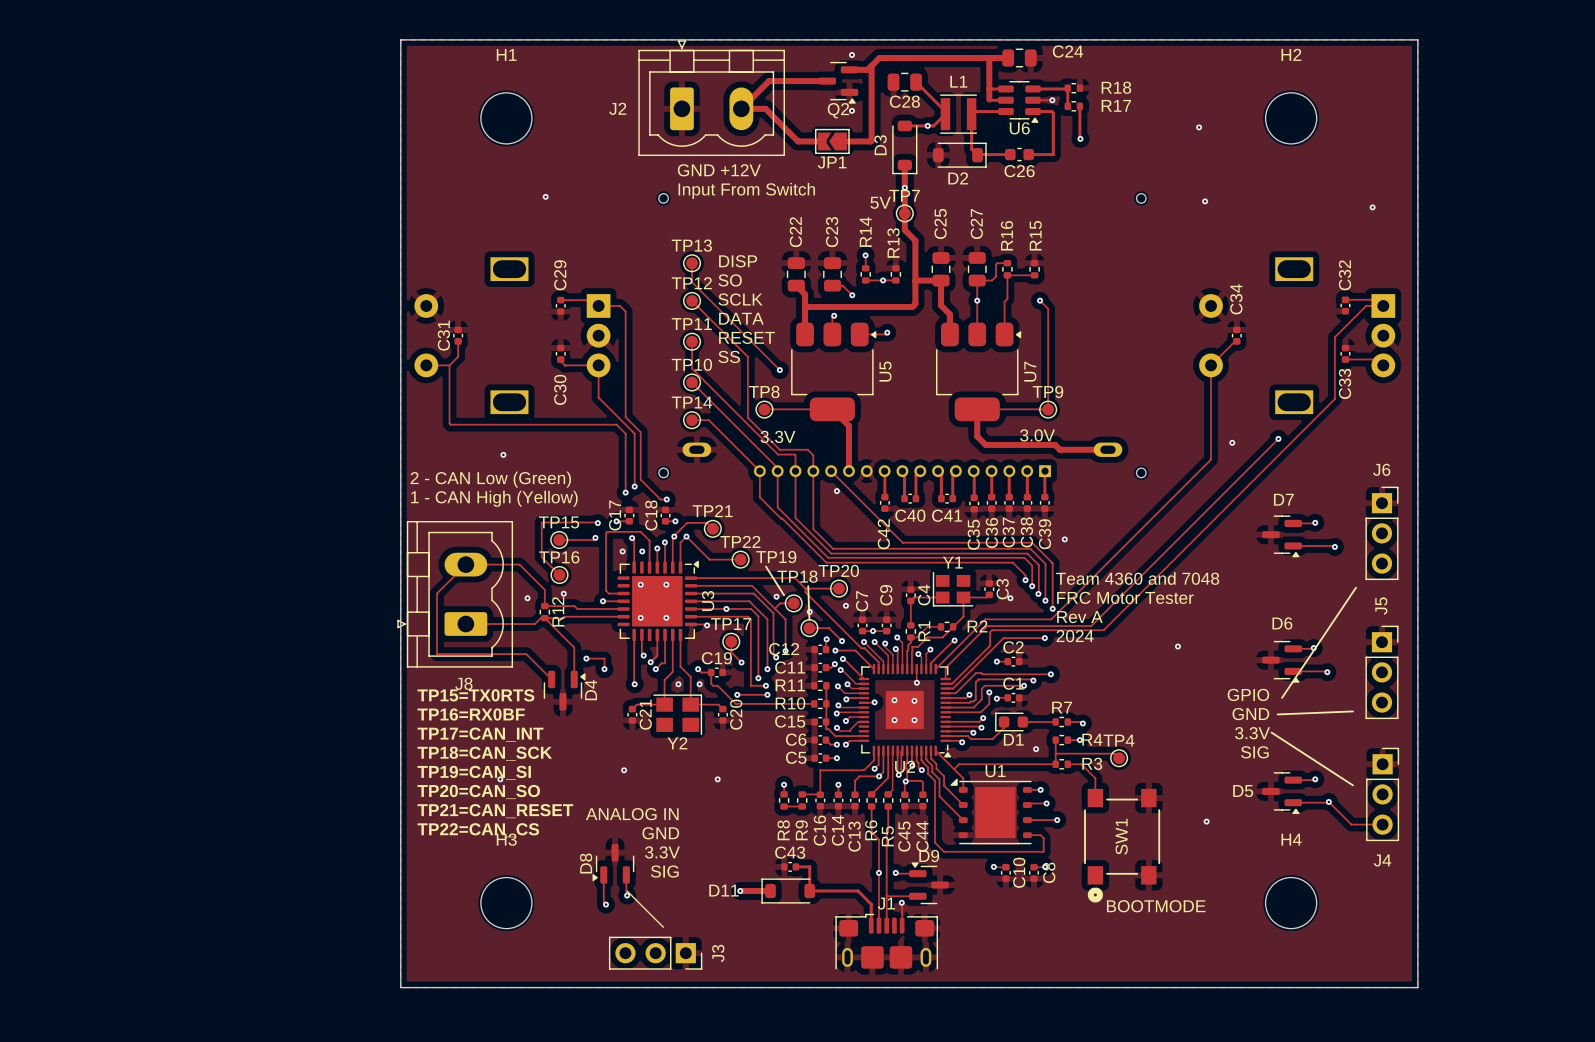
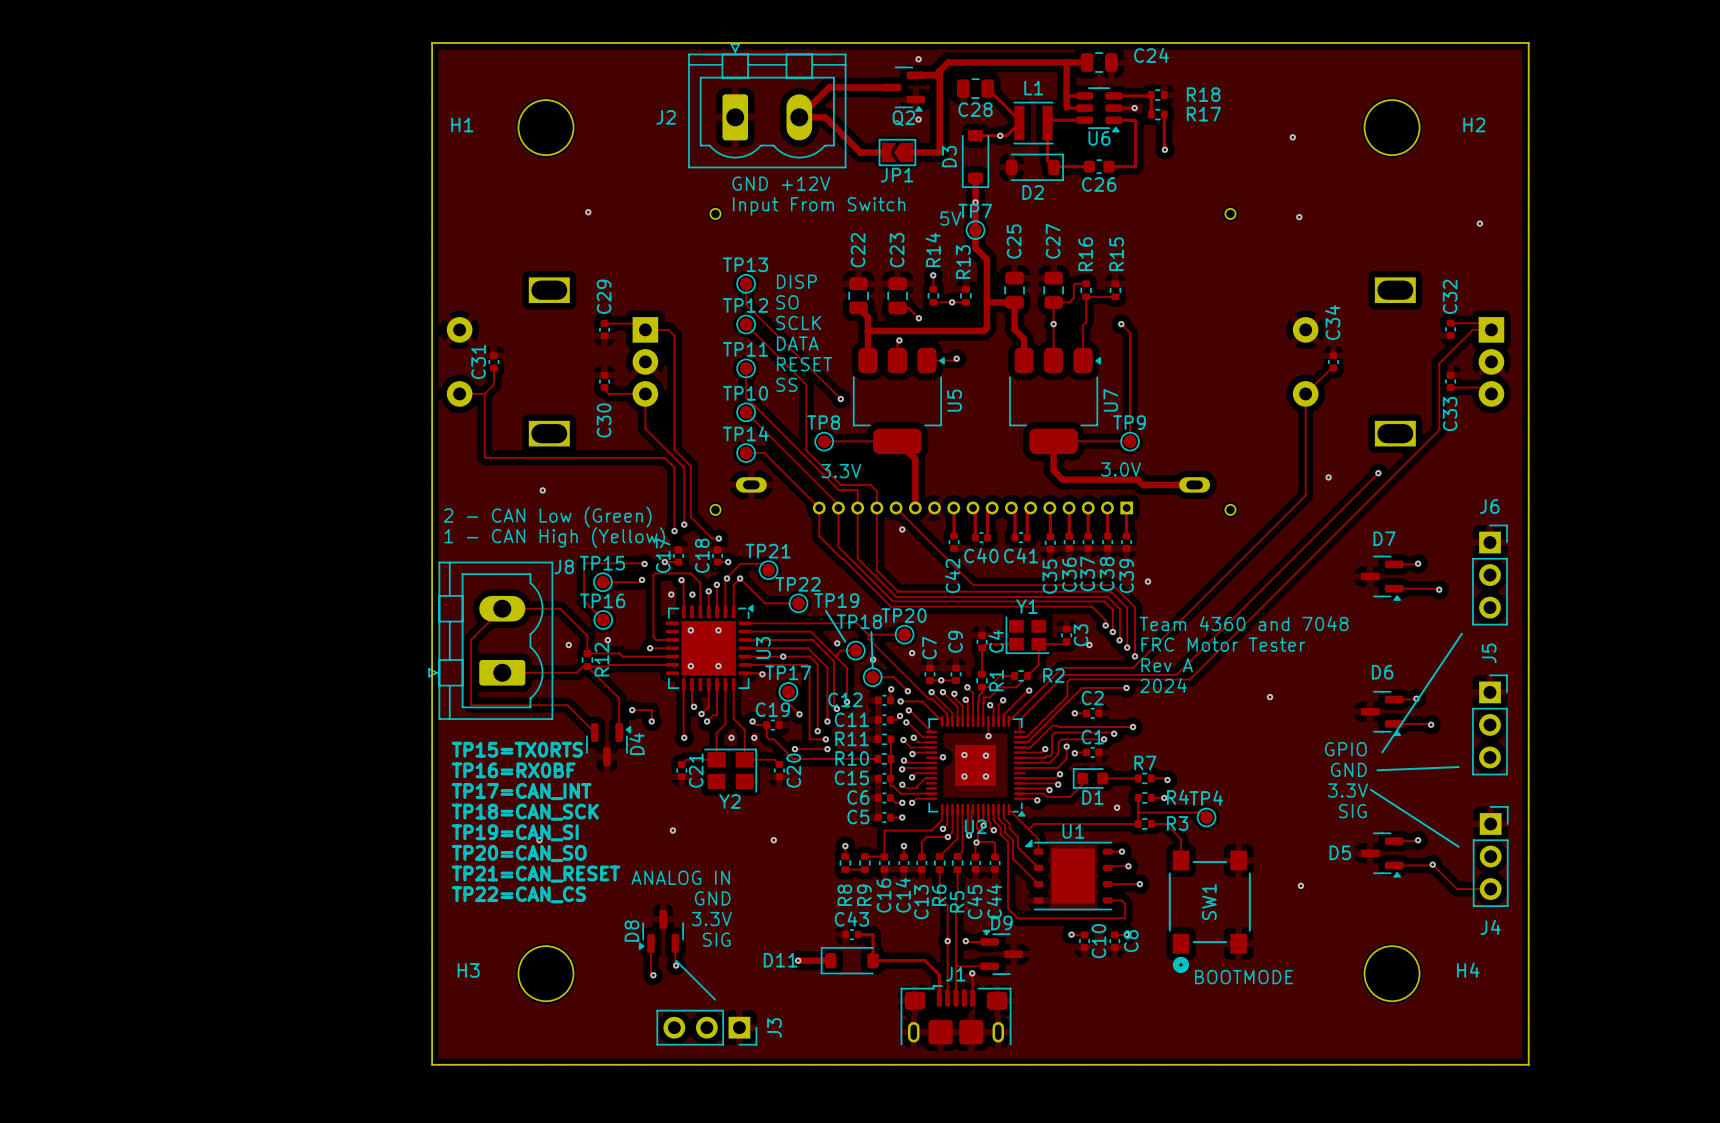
H1 name position: H1 (506, 54) -> H1 (462, 124)
H2 name position: H2 (1291, 54) -> H2 (1474, 124)
J8 name position: J8 (463, 683) -> J8 (564, 566)
H3 name position: H3 (506, 839) -> H3 (468, 970)
H4 name position: H4 (1291, 839) -> H4 (1468, 970)

